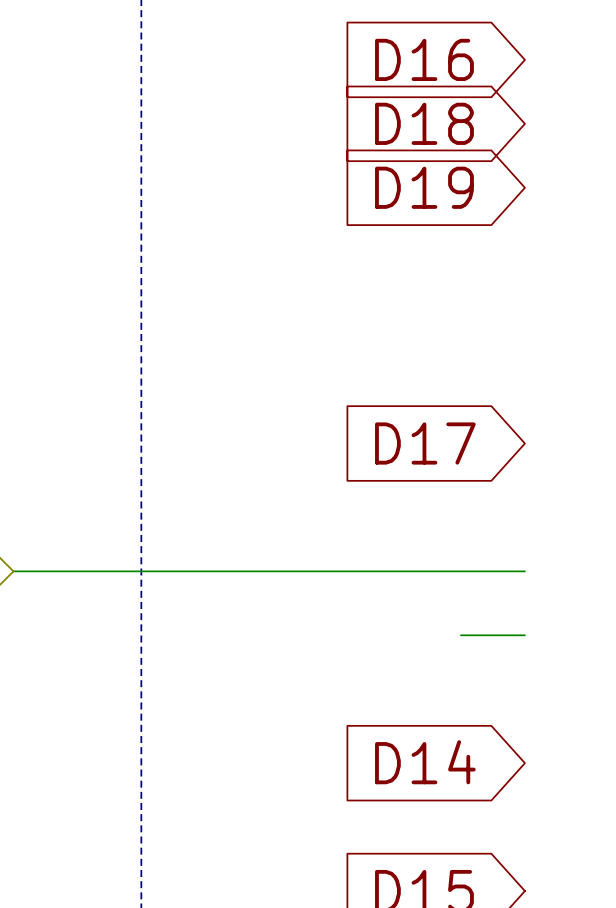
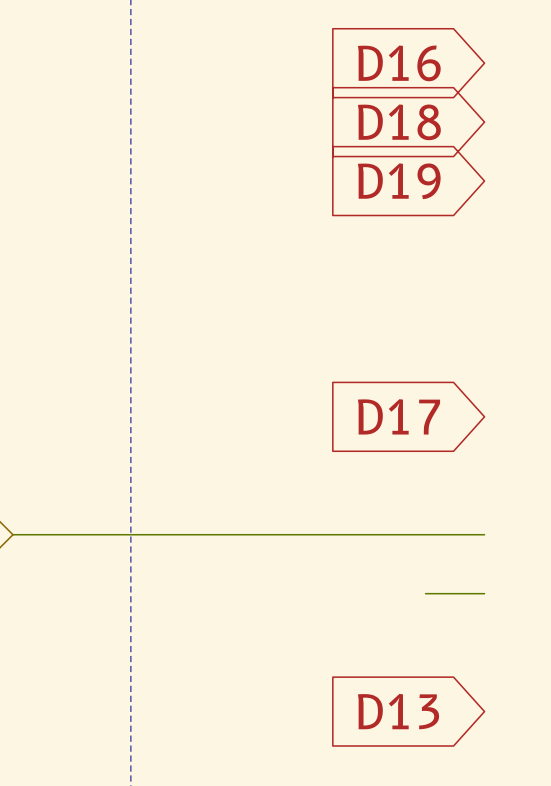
global label: D14 (425, 762) -> D13 (398, 711)

